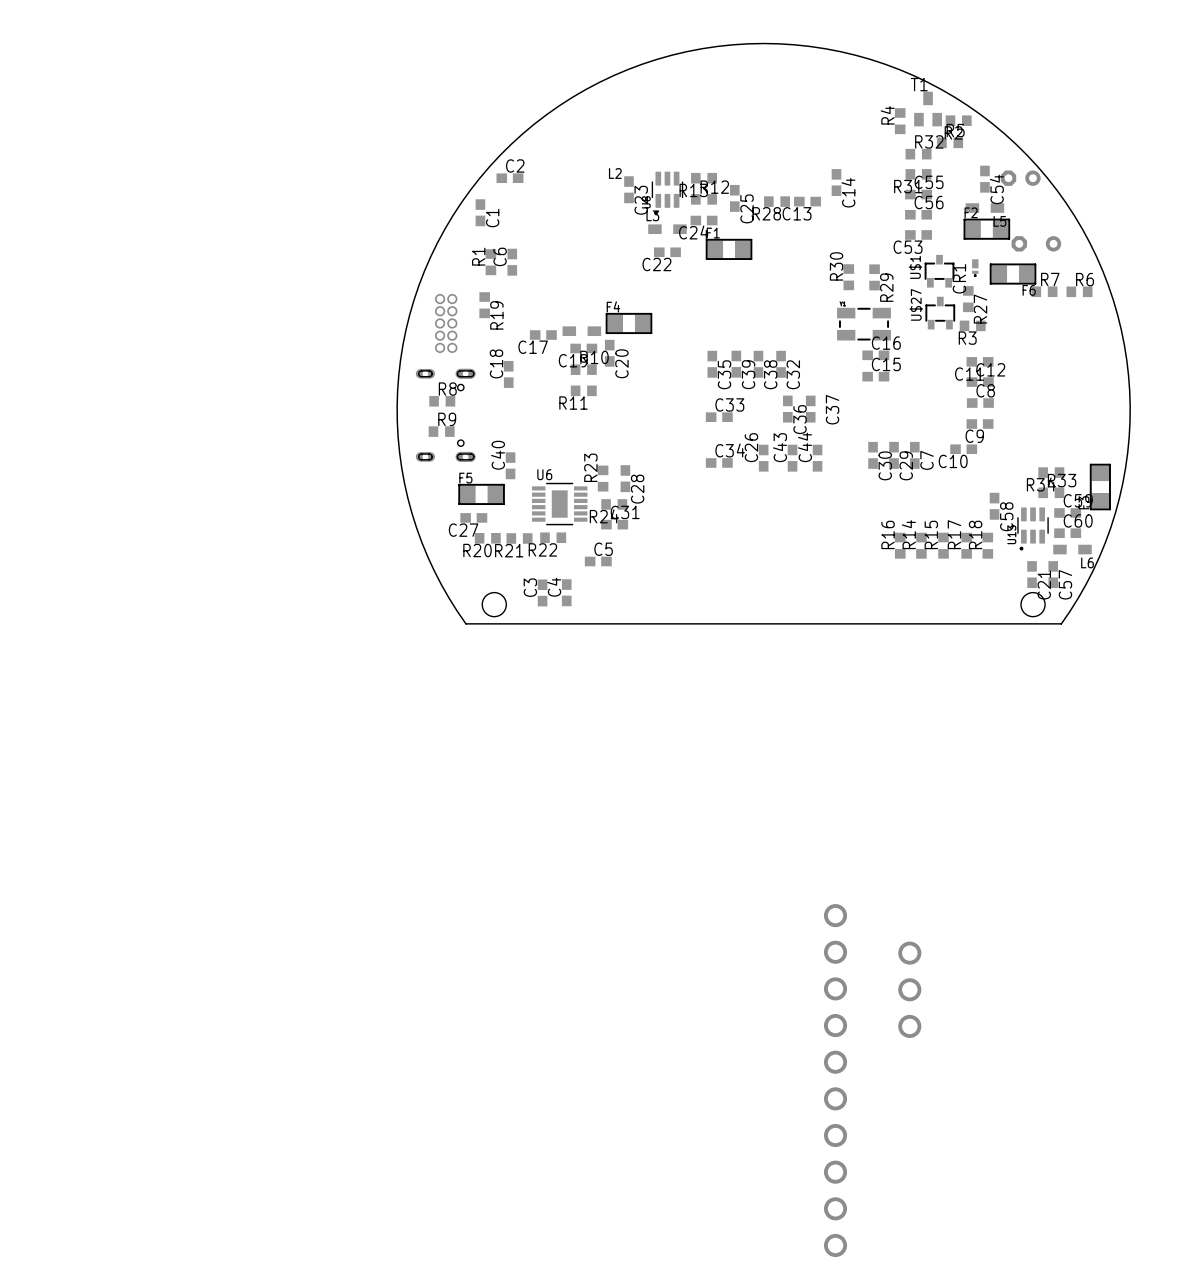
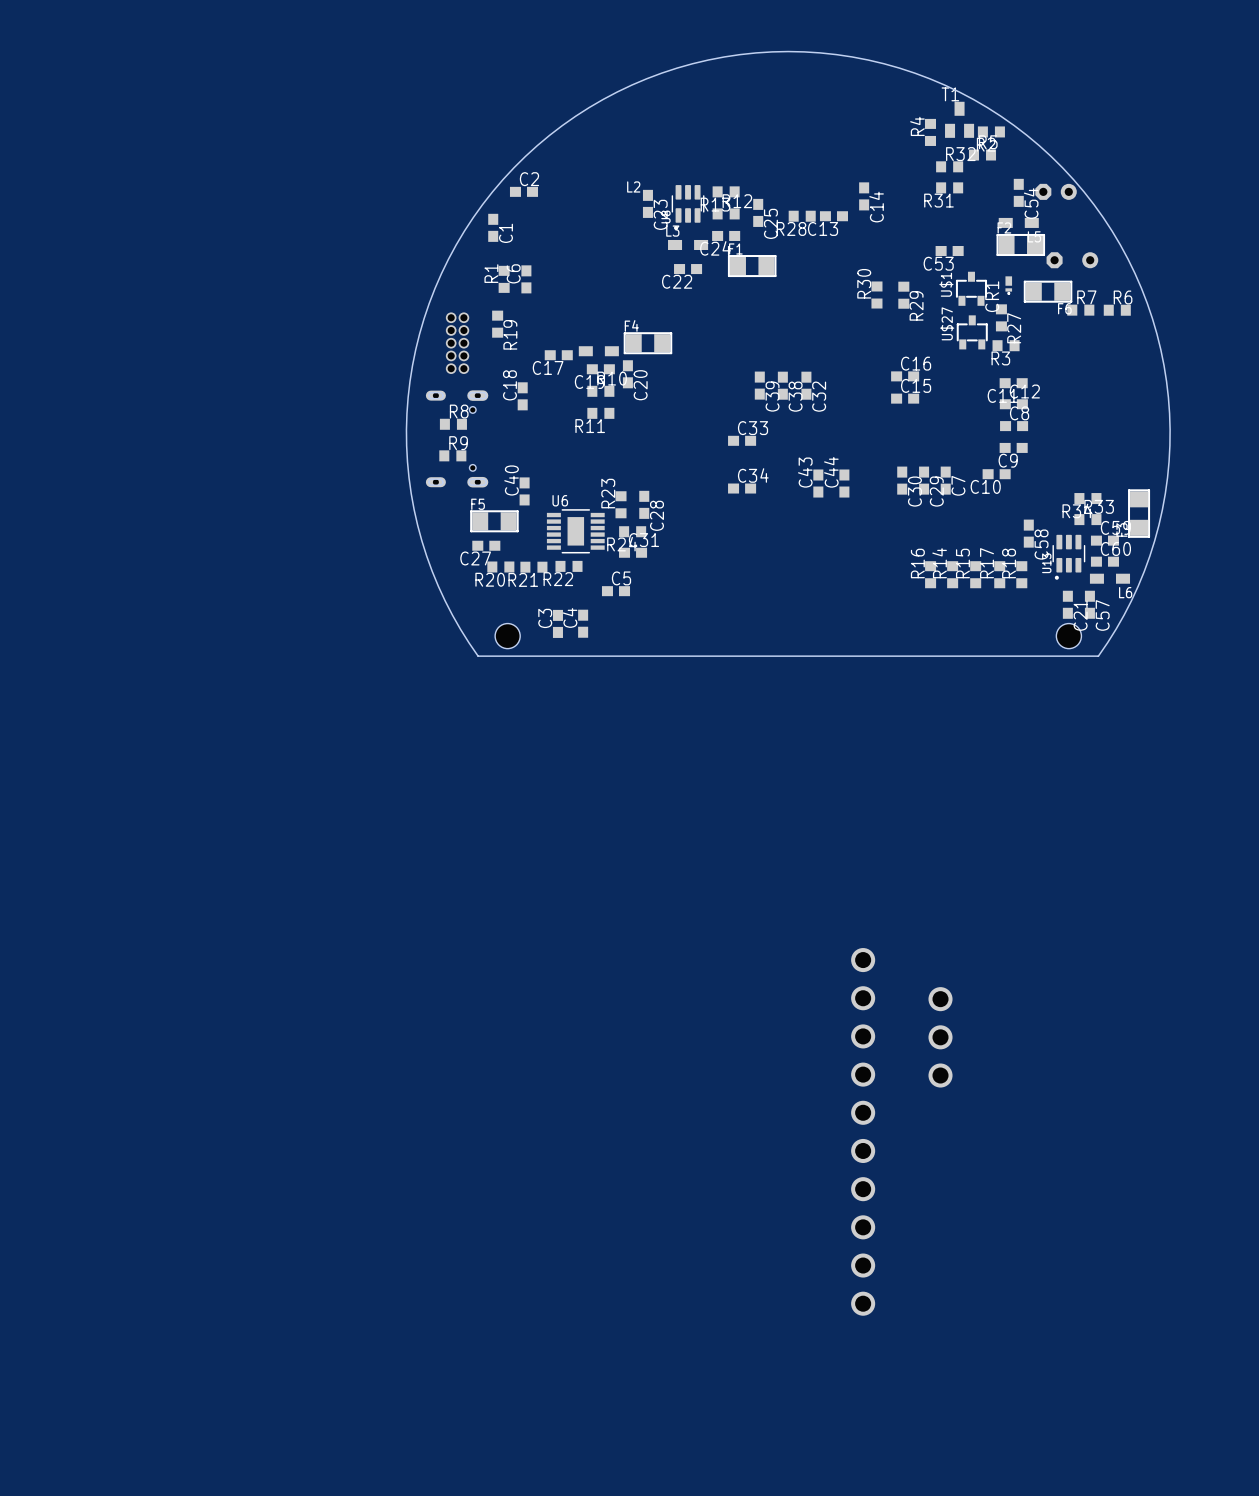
C55: (918, 194) -> none
C56: (918, 214) -> none
part: (864, 324) -> none
C35: (712, 364) -> none
C36: (787, 409) -> none
C37: (810, 409) -> none
C26: (763, 458) -> none

